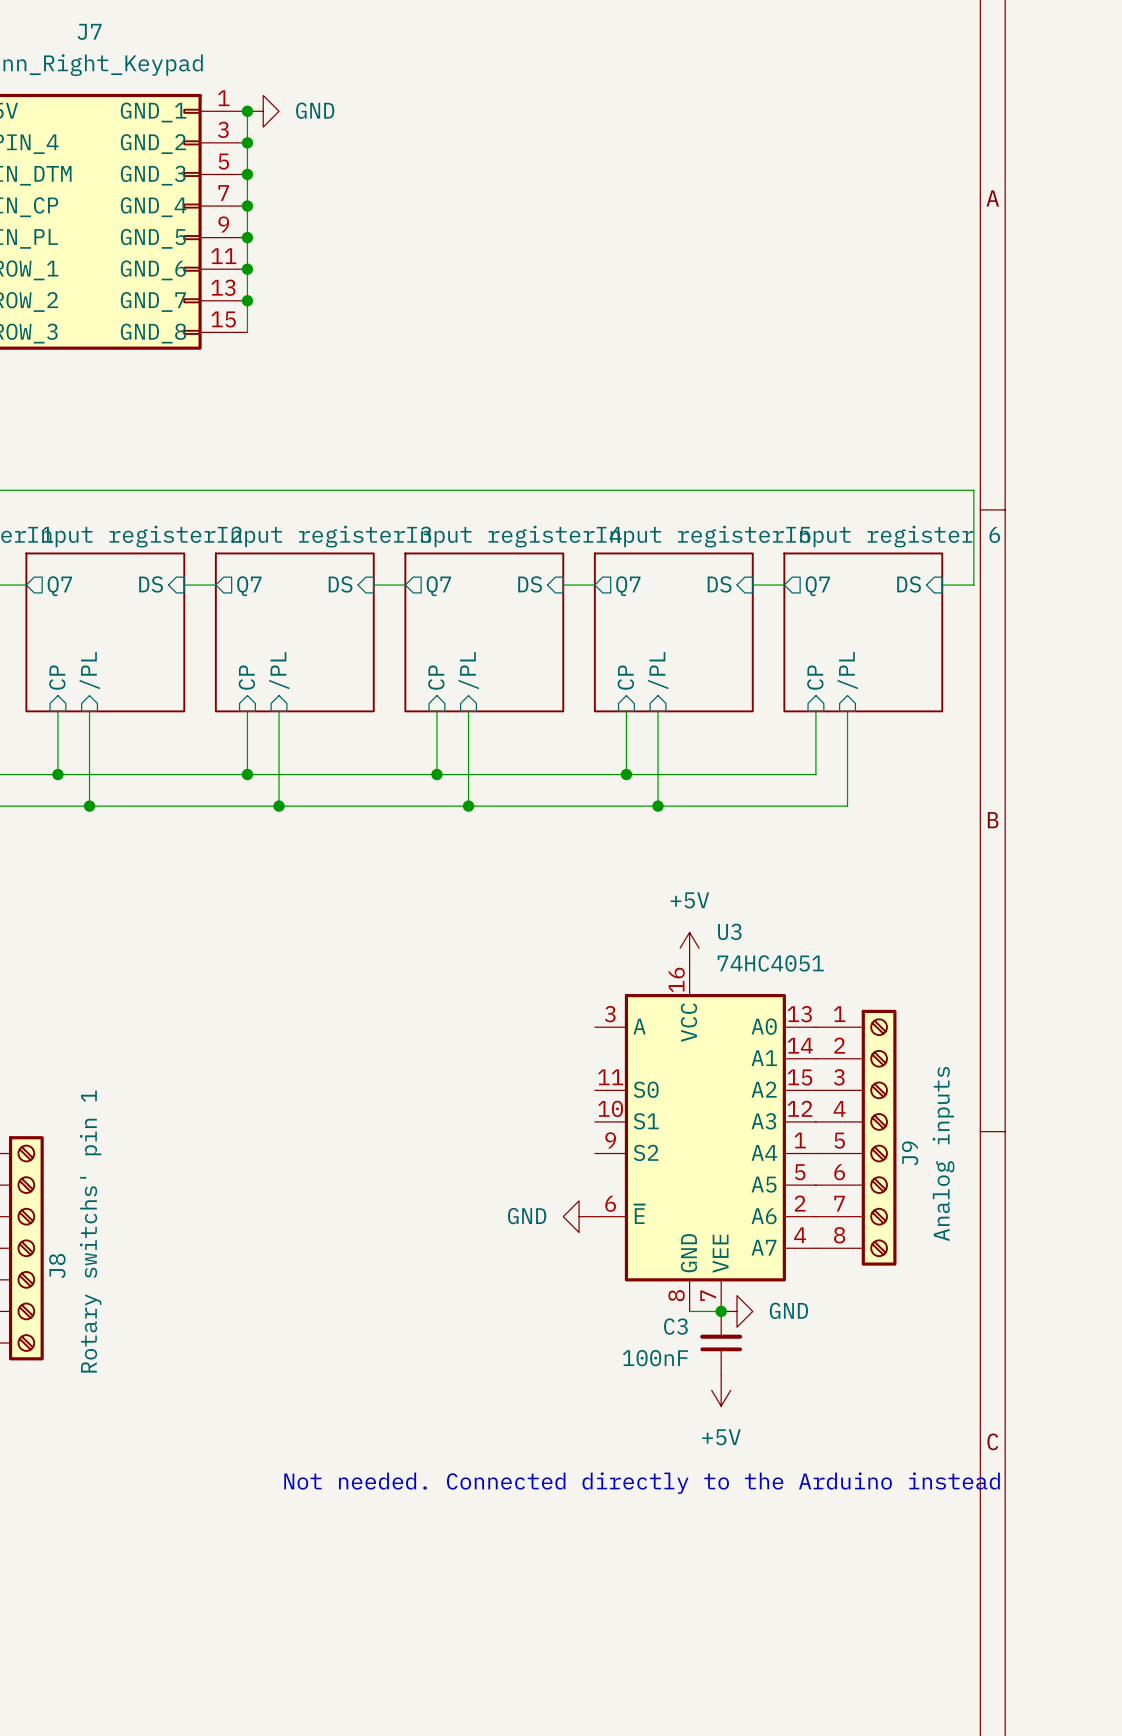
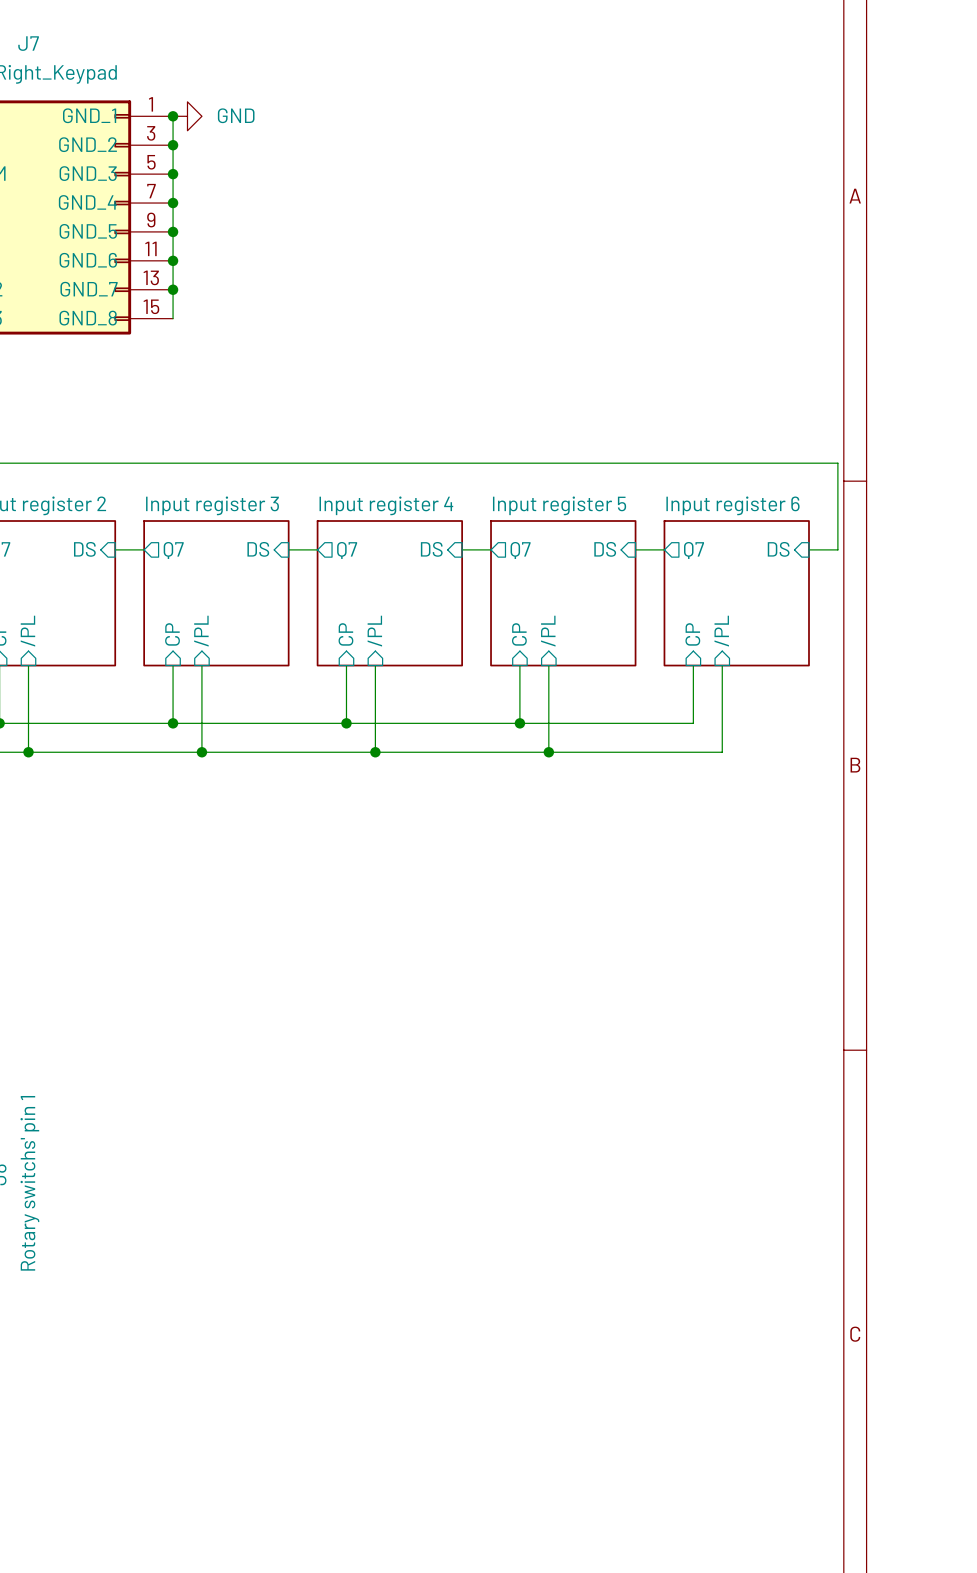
power symbol: +5V (689, 948) -> none
U3: 74HC4051 (705, 1137) -> none
J9: Analog inputs (856, 1137) -> none
power symbol: GND (579, 1216) -> none
wire: (689, 1311) (721, 1311) -> none
junction: (721, 1311) -> none
power symbol: GND (736, 1311) -> none
C3: 100nF (721, 1343) -> none
power symbol: +5V (721, 1390) -> none
text: Not needed. Connected directly to the Arduino instead (642, 1483) -> none

